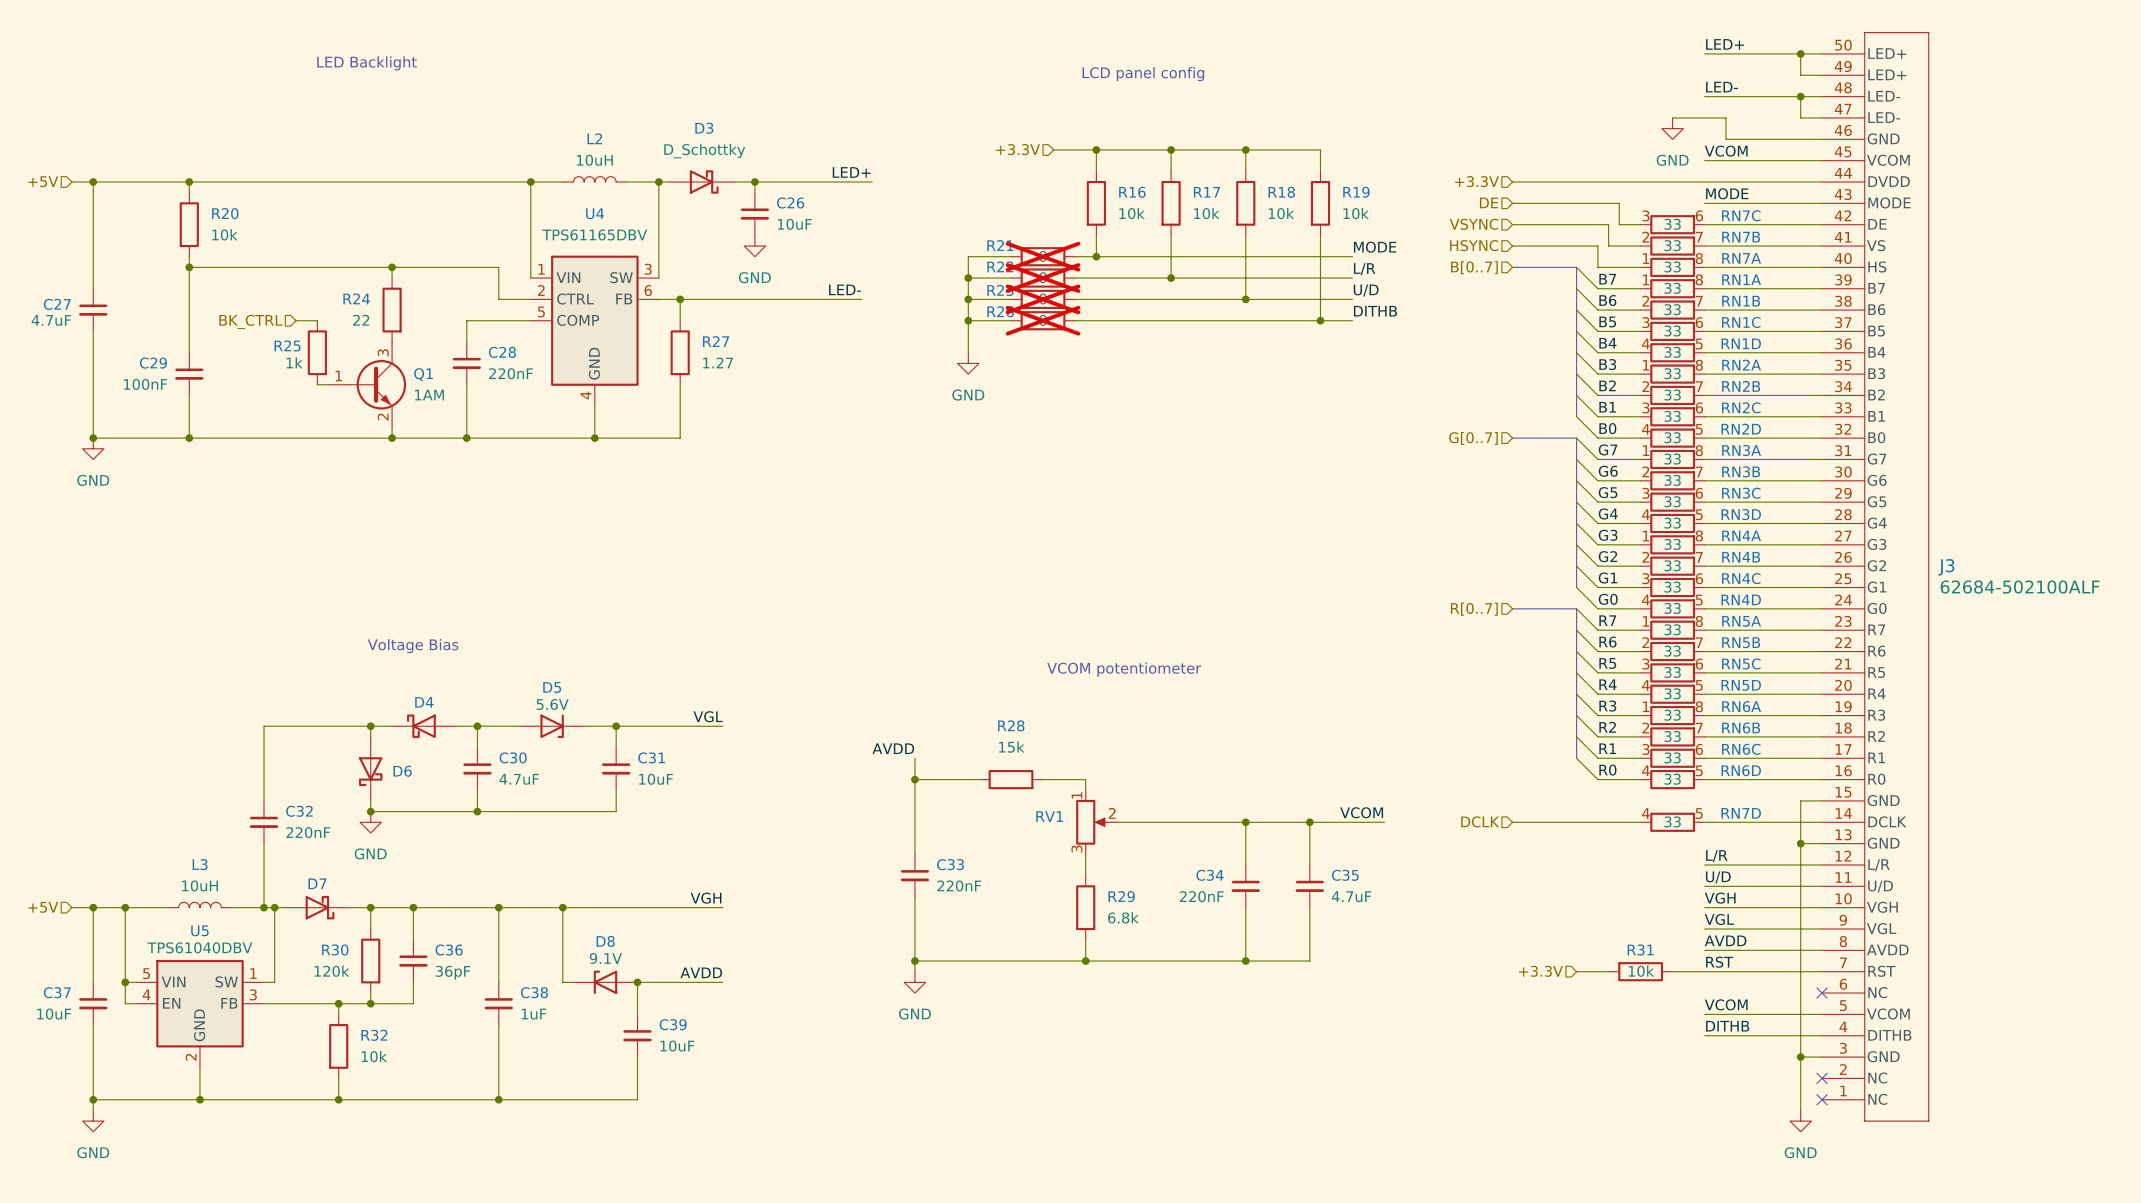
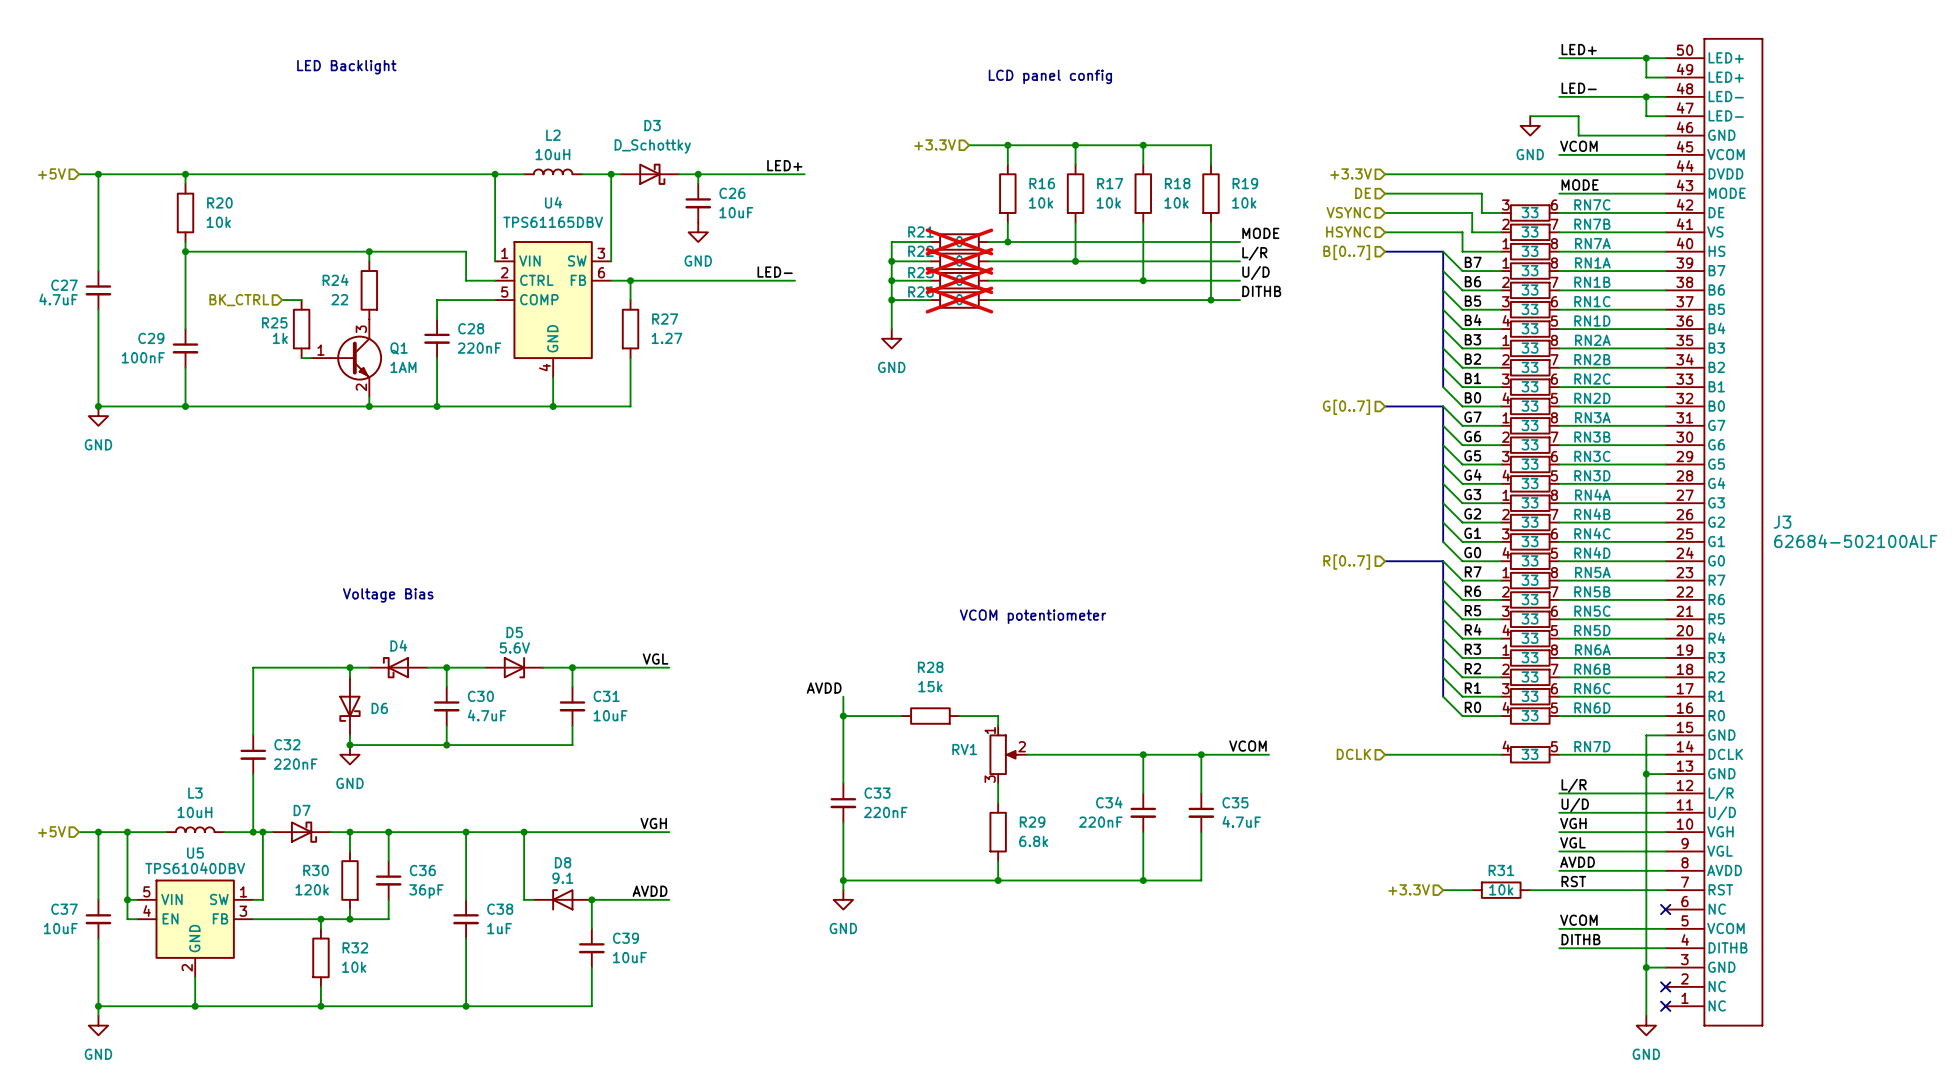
D8 value: 9.1V (605, 958) -> 9.1 (562, 878)

